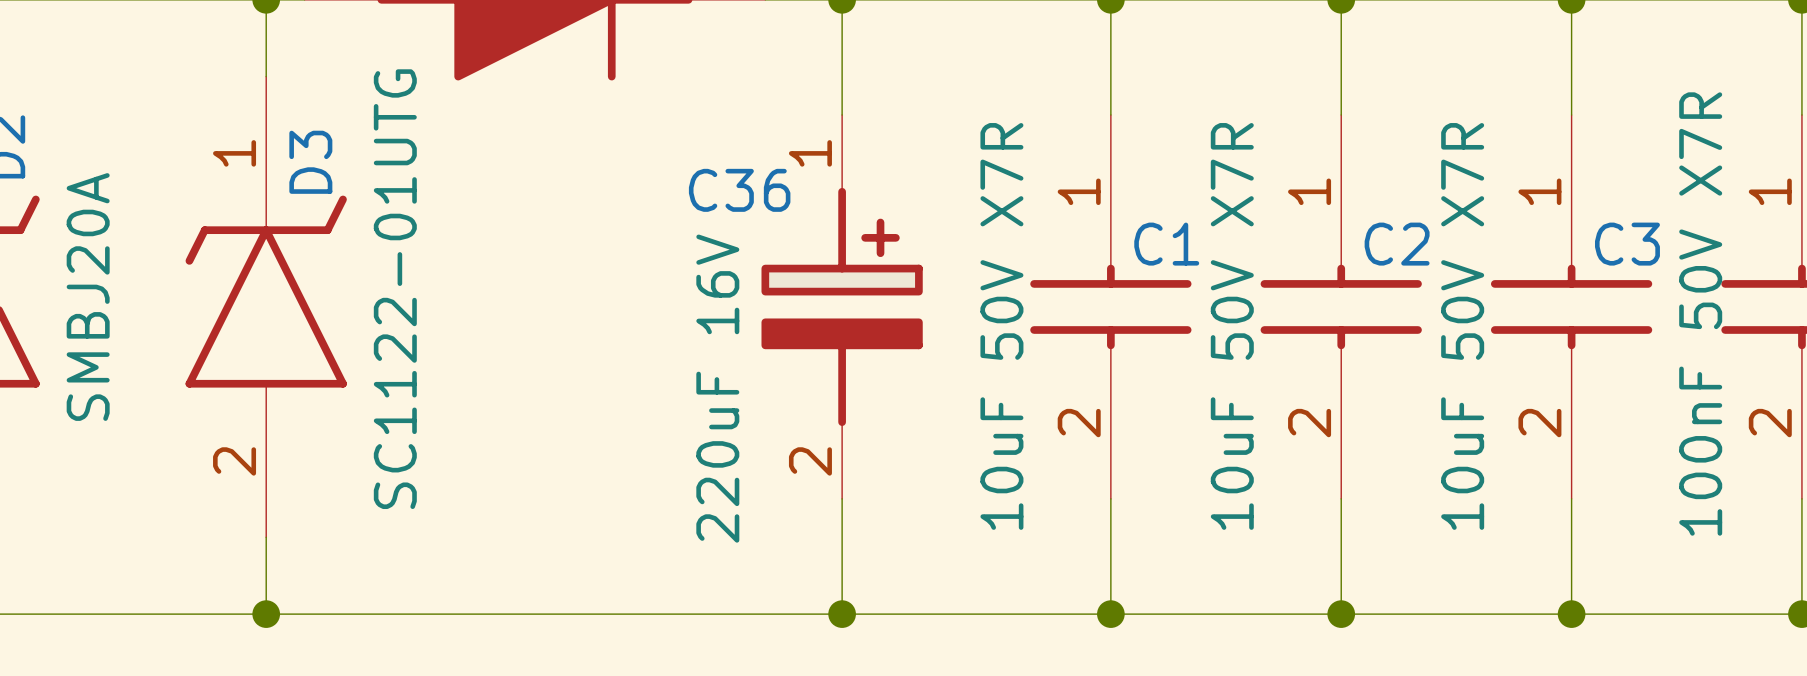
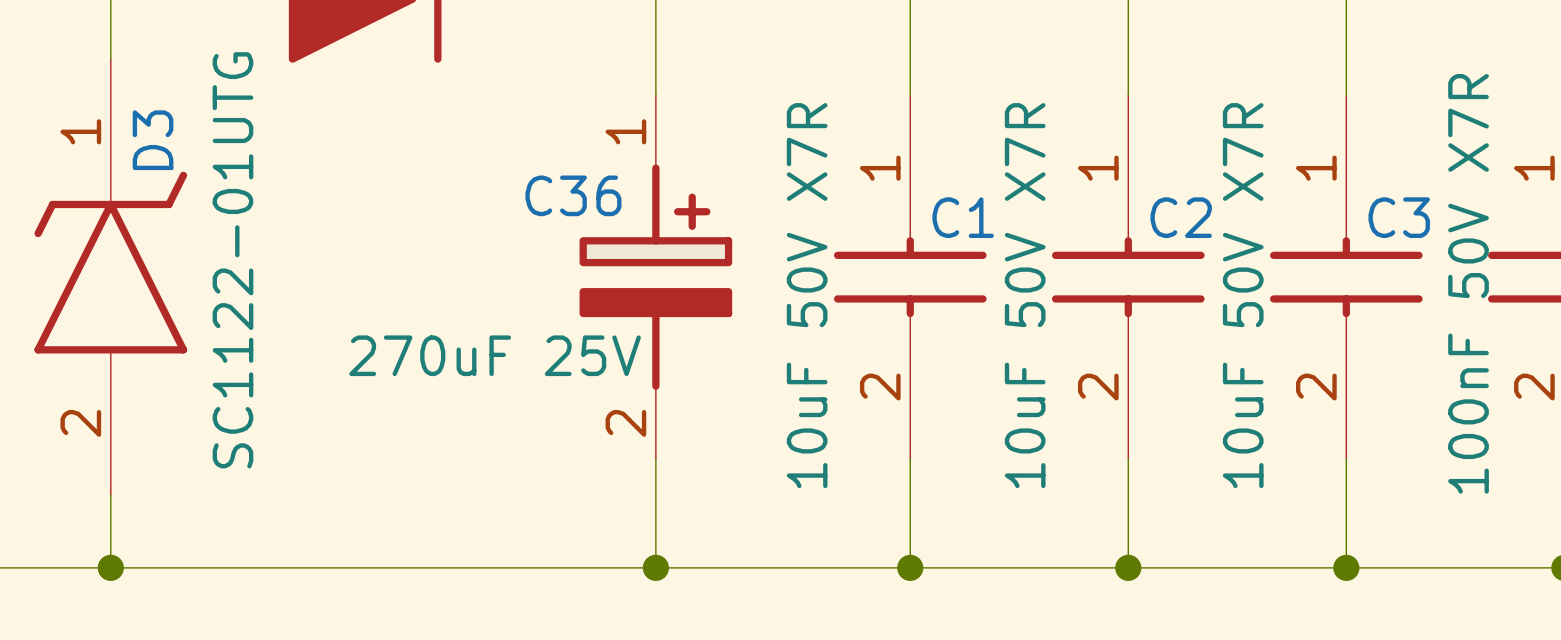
C36 name position: C36 (739, 190) -> C36 (573, 195)
C36 value: 220uF 16V (717, 388) -> 270uF 25V (495, 355)

